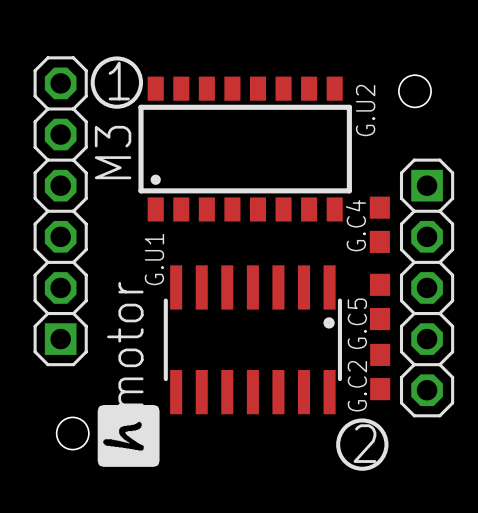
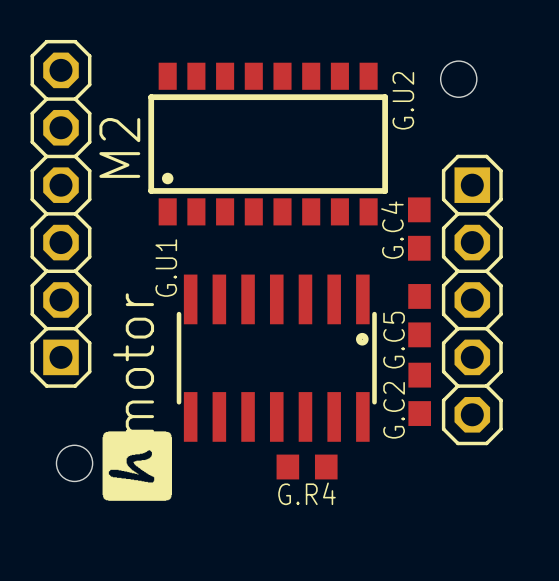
drawing: [90, 56, 144, 109] -> none
text: 1 (119, 81) -> none
text: M3 (113, 152) -> M2 (119, 147)
drawing: [336, 418, 389, 471] -> none
G.R4: none -> (307, 467)
text: 2 (364, 443) -> none

